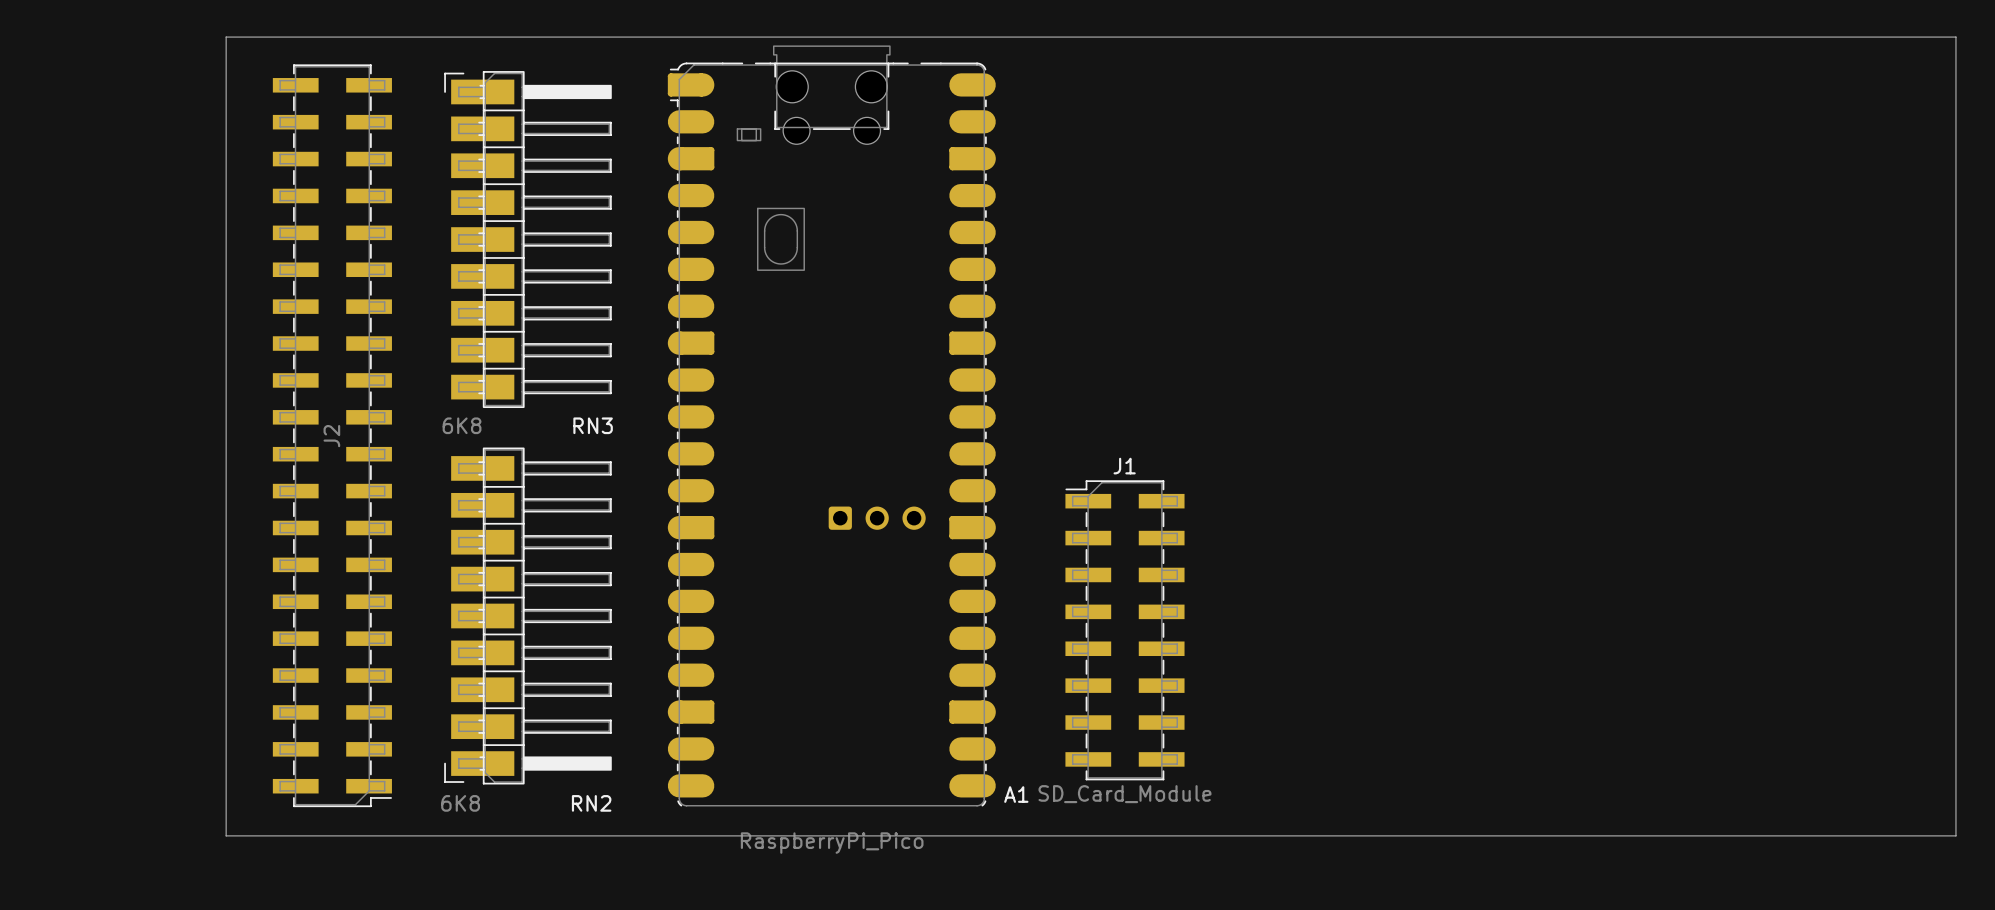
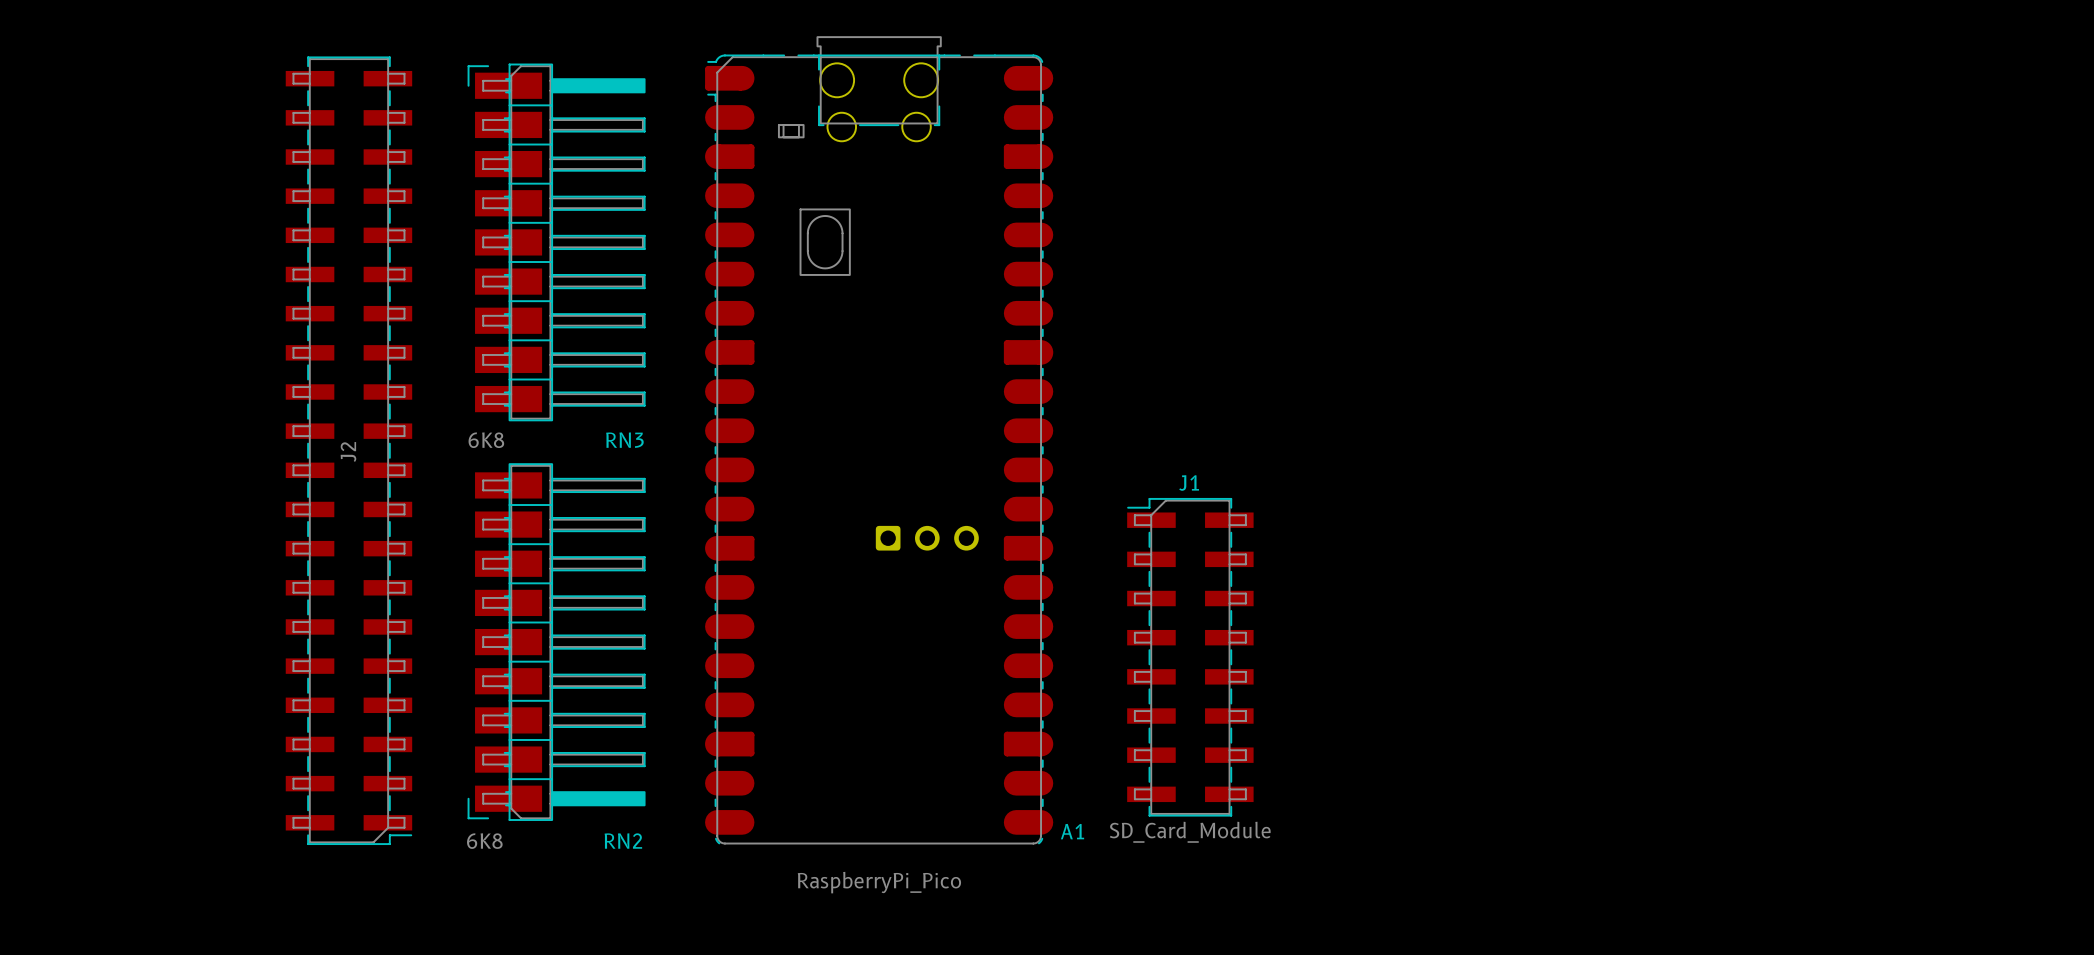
board edge: (226, 37) (1955, 37) (1955, 835) (226, 835) (226, 37) -> none

